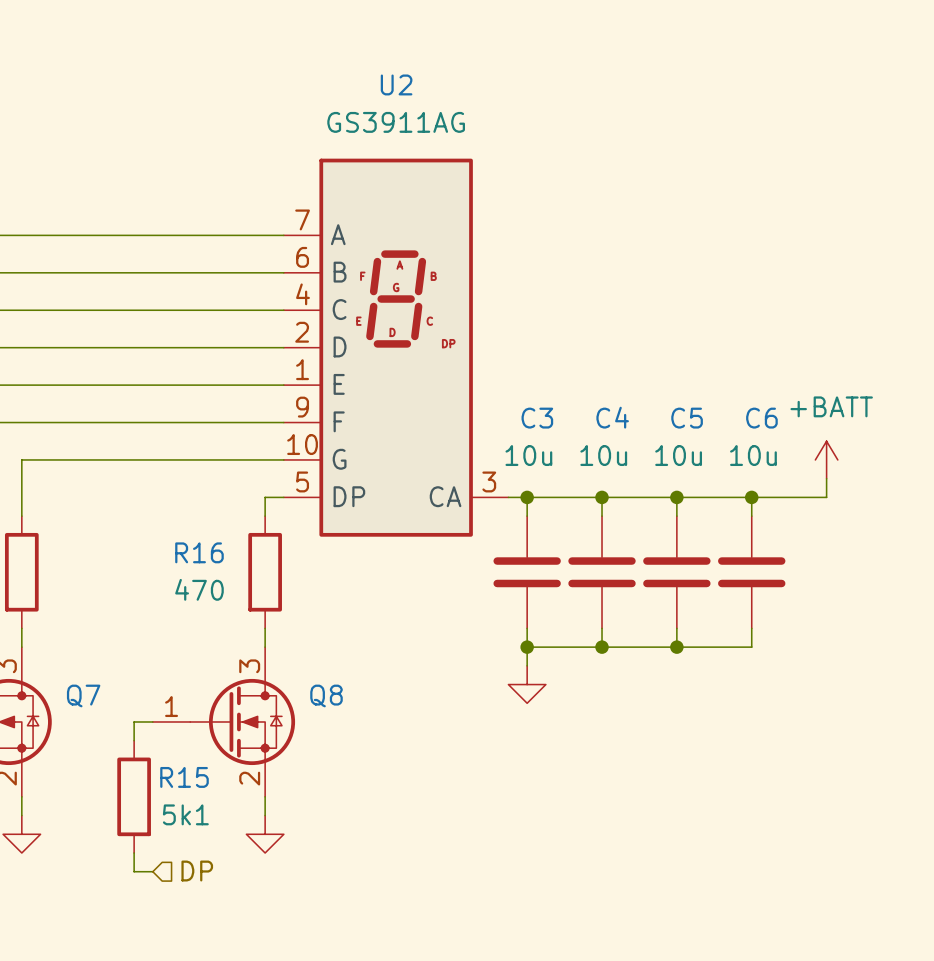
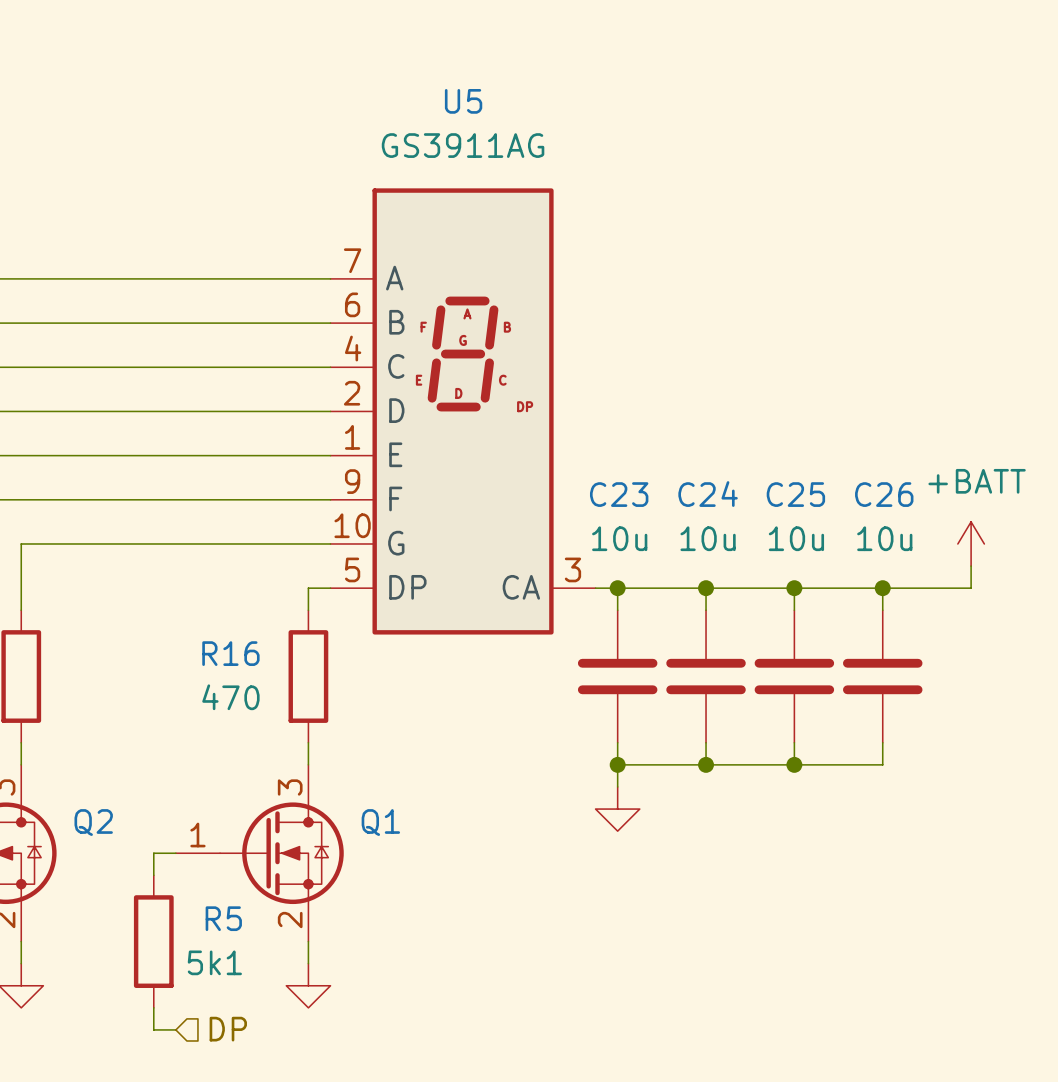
U2 name: U2 (396, 84) -> U5 (463, 101)
C4 name: C4 (612, 417) -> C24 (708, 494)
C3 name: C3 (537, 418) -> C23 (619, 494)
C5 name: C5 (687, 418) -> C25 (795, 494)
C6 name: C6 (761, 418) -> C26 (884, 494)
Q7 name: Q7 (83, 695) -> Q2 (93, 822)
Q8 name: Q8 (326, 695) -> Q1 (380, 822)
R15 name: R15 (184, 777) -> R5 (223, 918)

